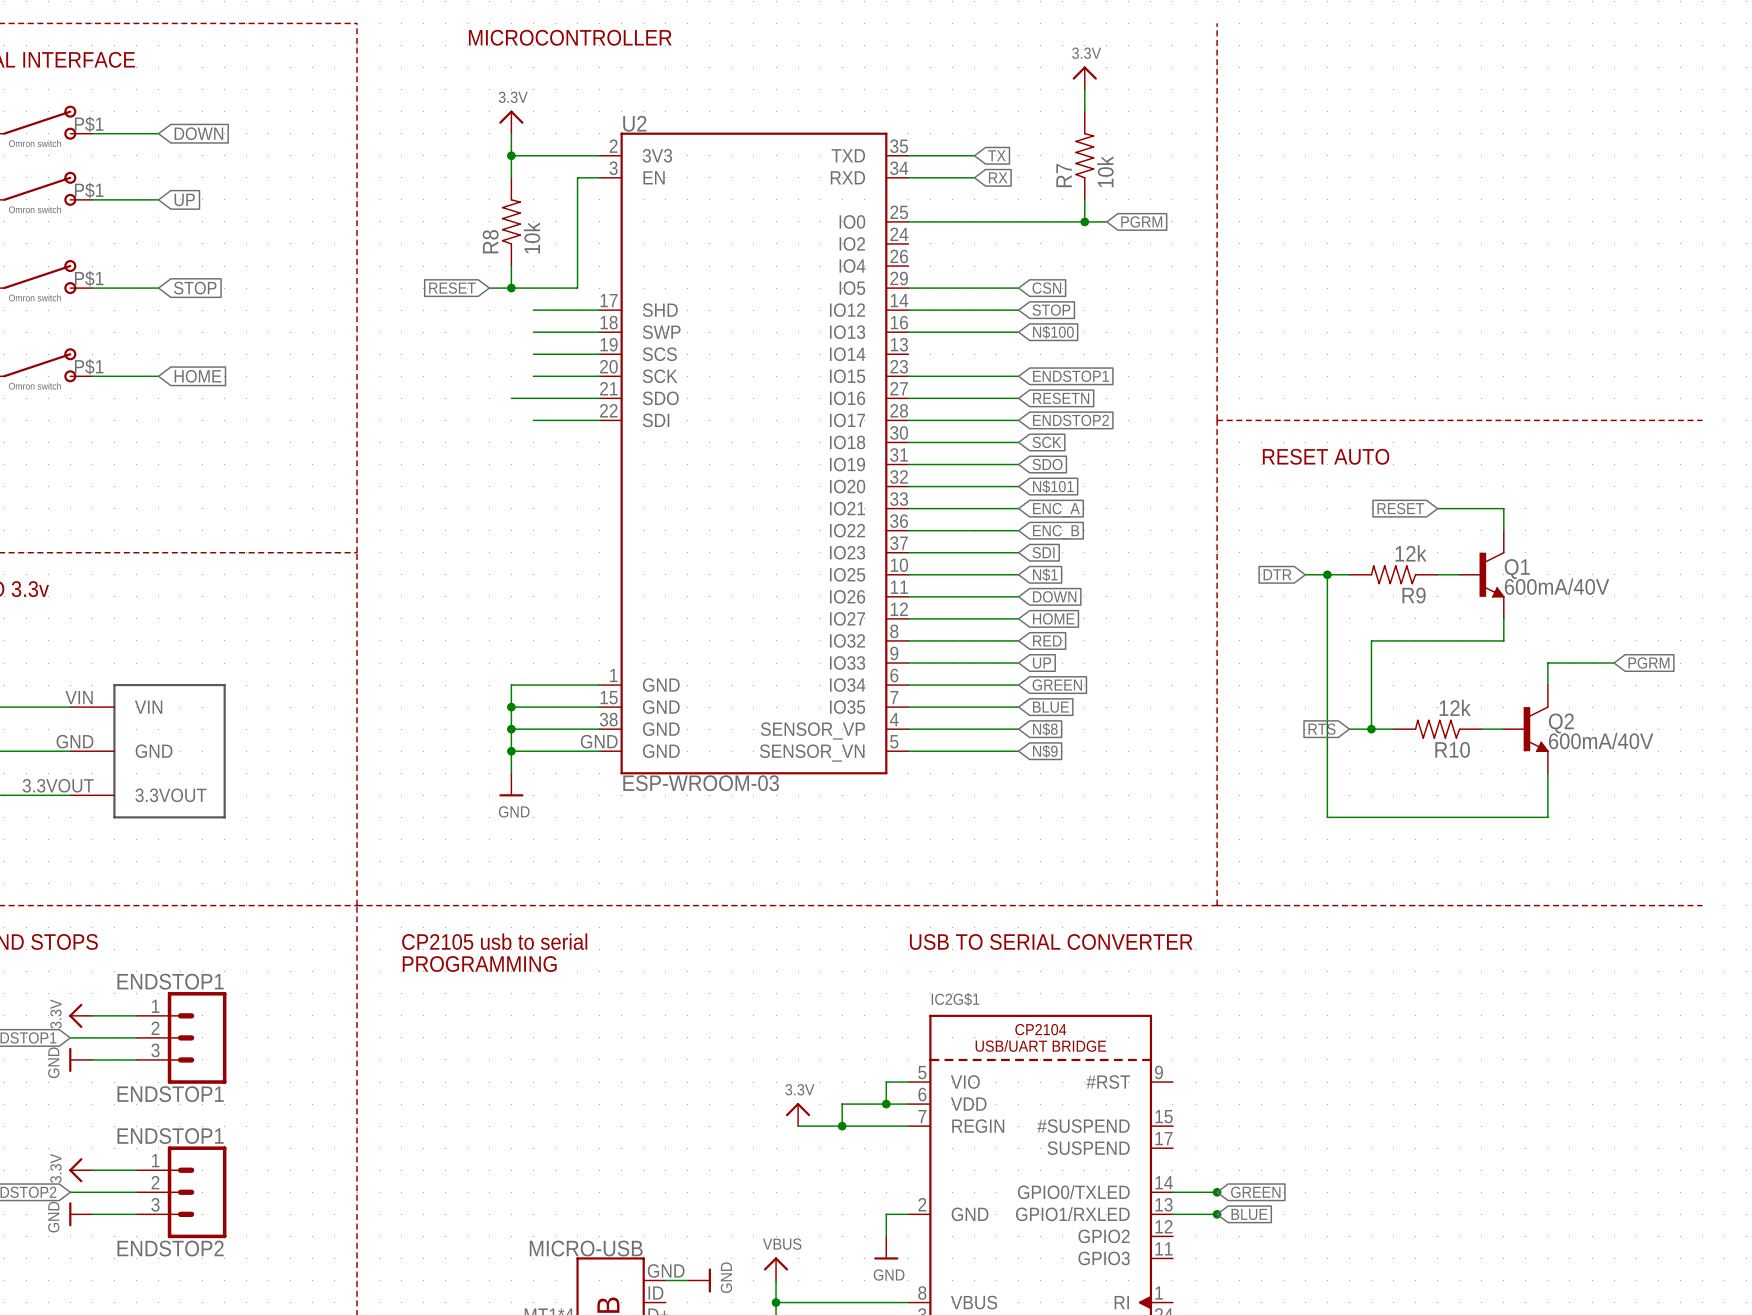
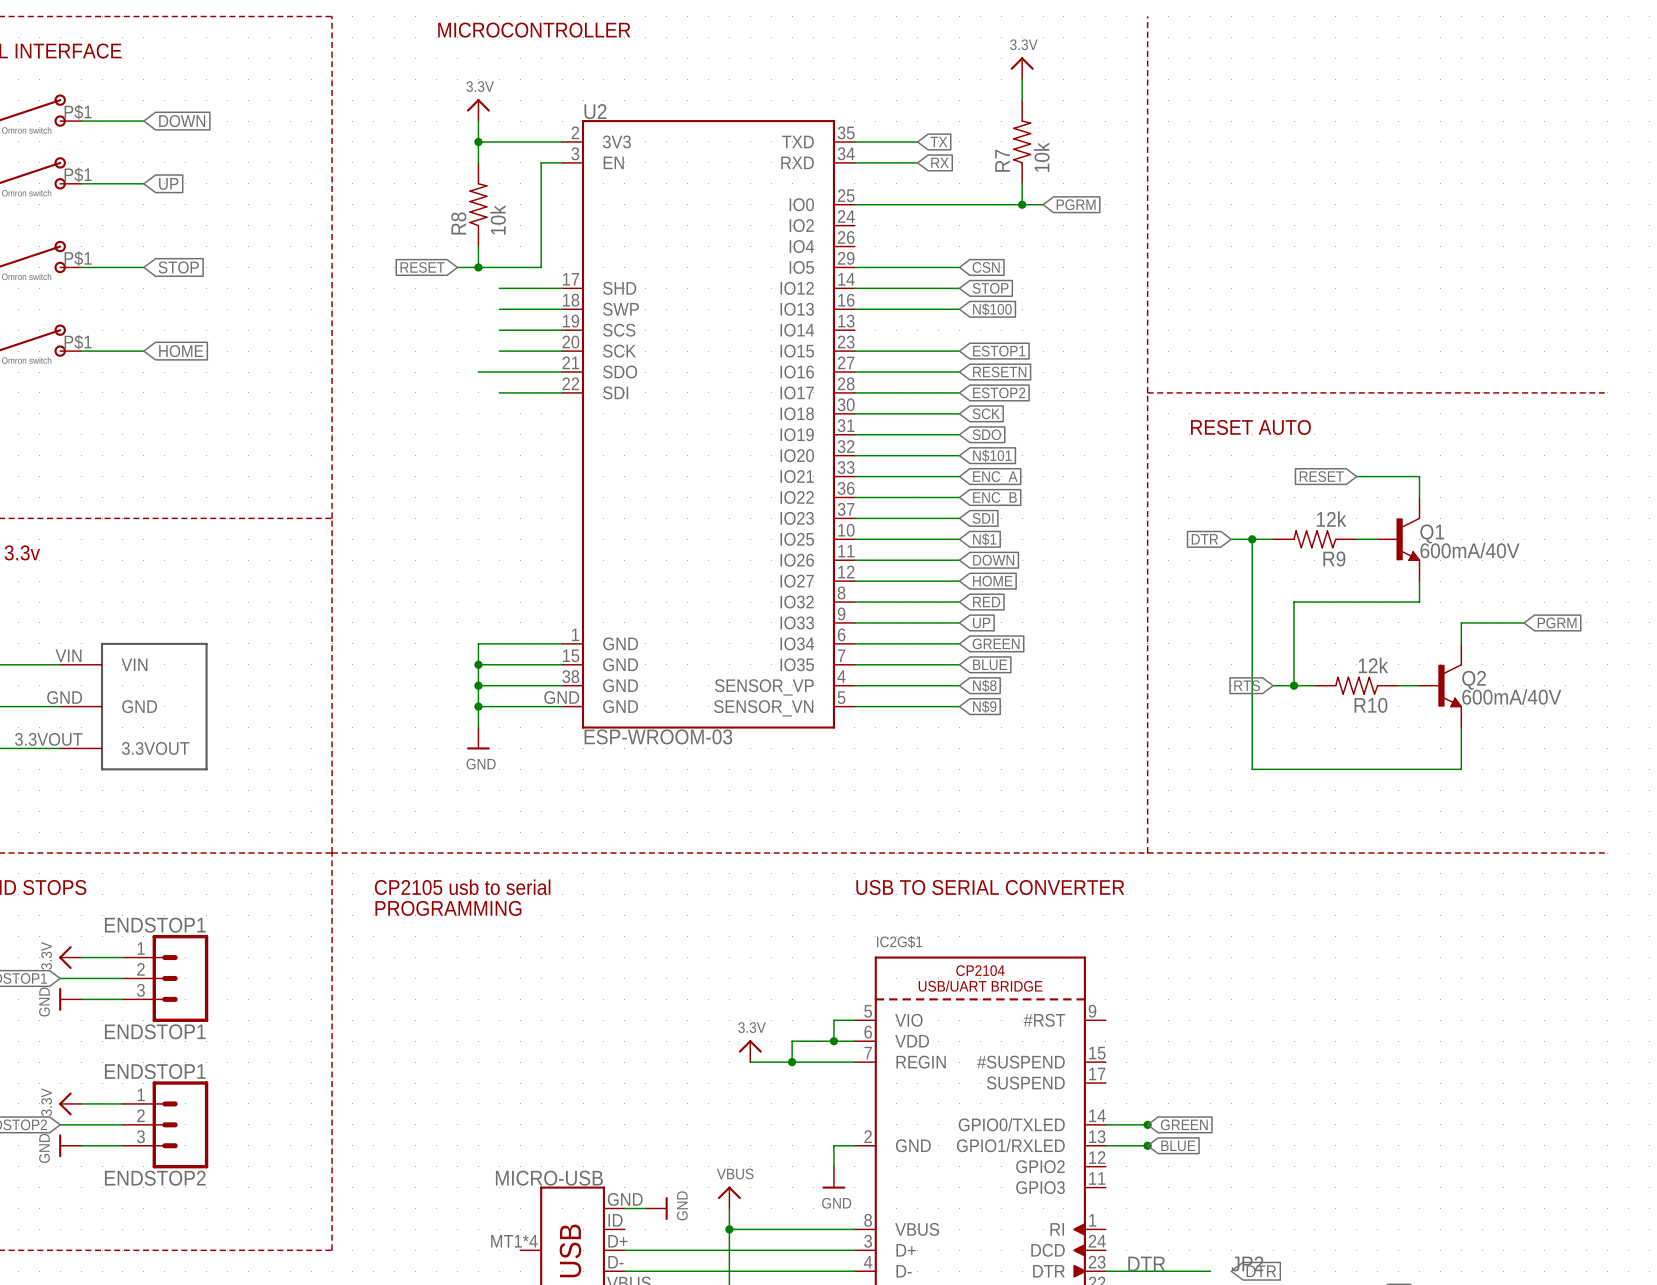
global label: ENDSTOP1 (1070, 376) -> ESTOP1 (999, 351)
global label: ENDSTOP2 (1070, 420) -> ESTOP2 (999, 392)

